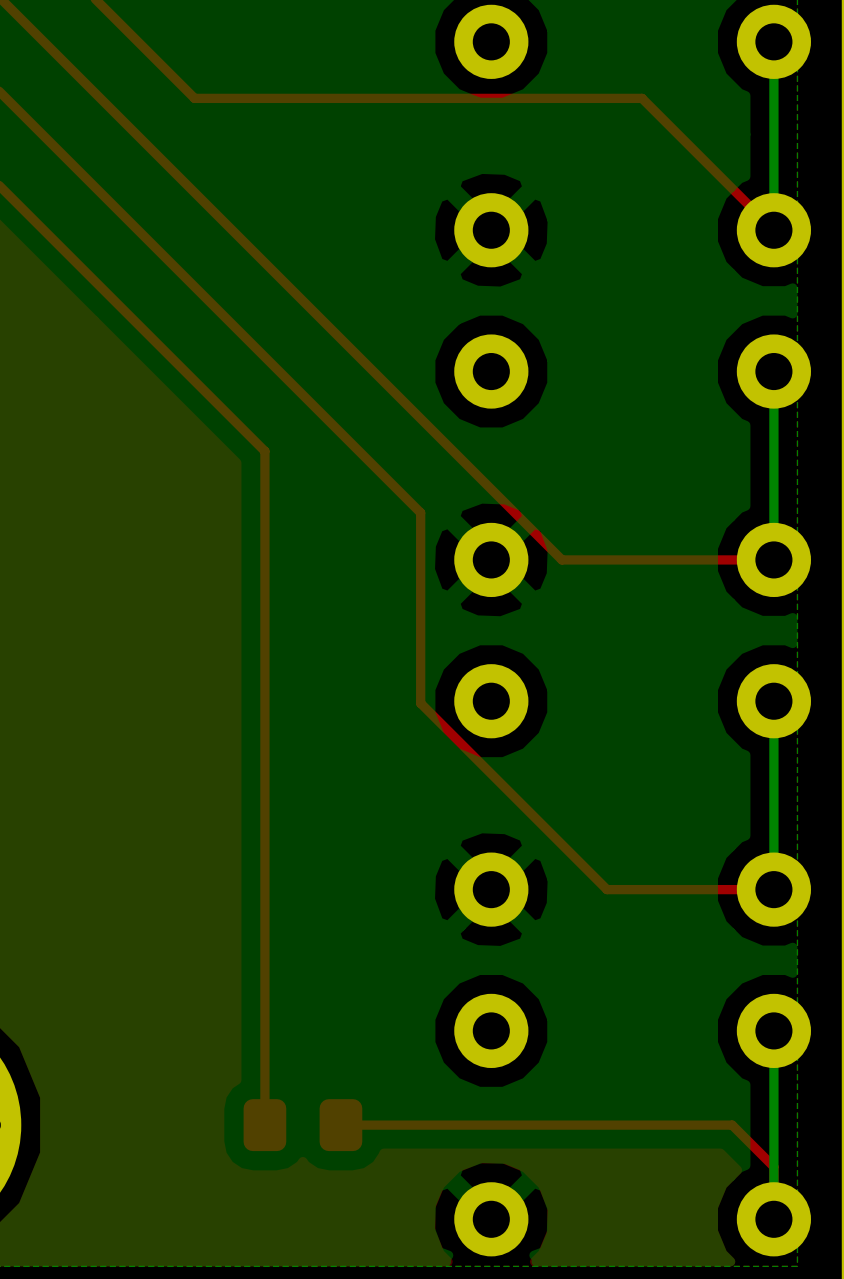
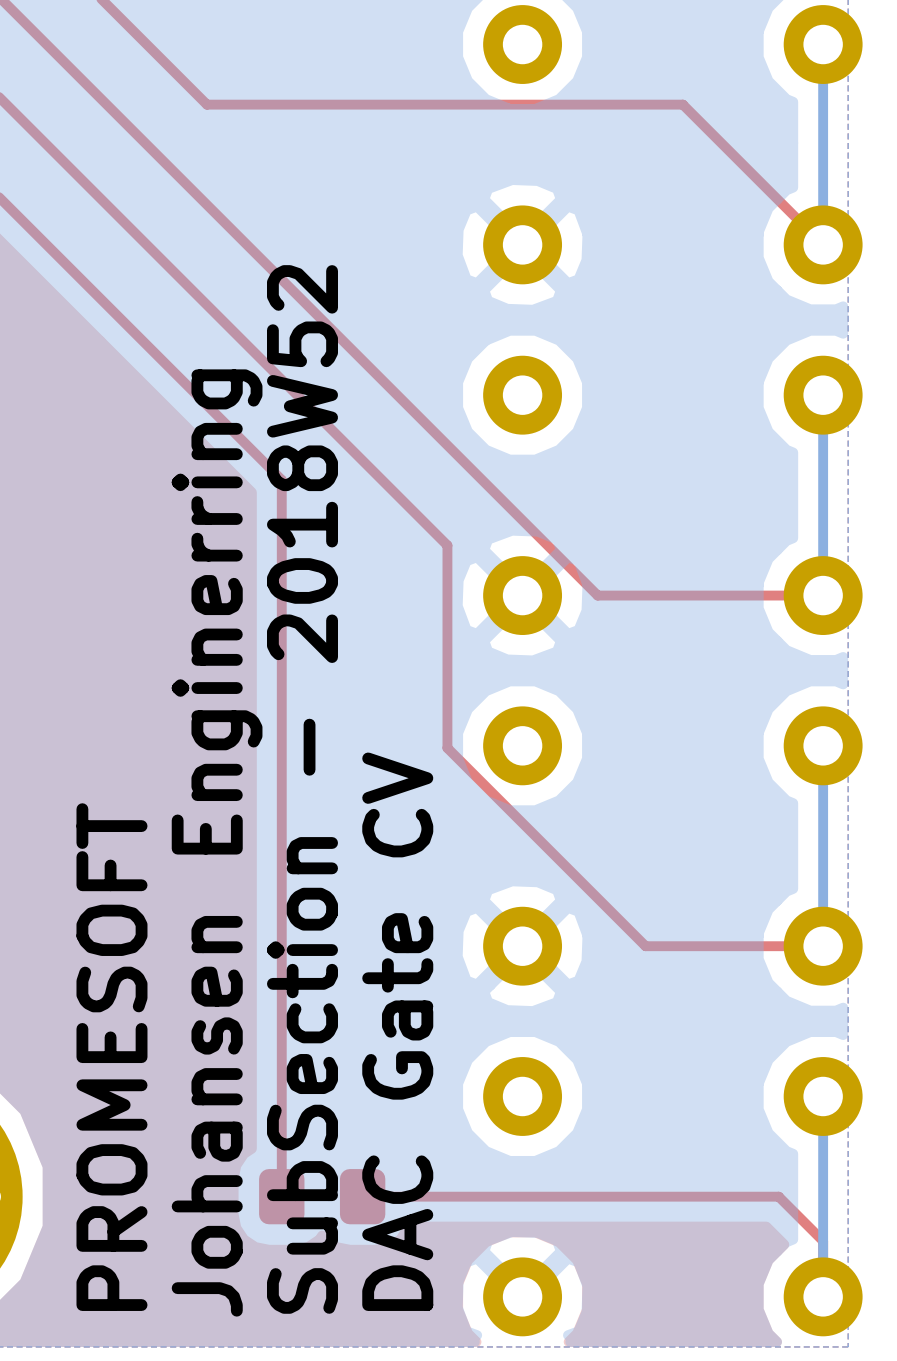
text: none -> SubSection - 2018W52 (302, 789)
text: none -> Johansen Enginerring (217, 842)
text: none -> DAC Gate CV (397, 1031)
text: none -> PROMESOFT (111, 1057)

